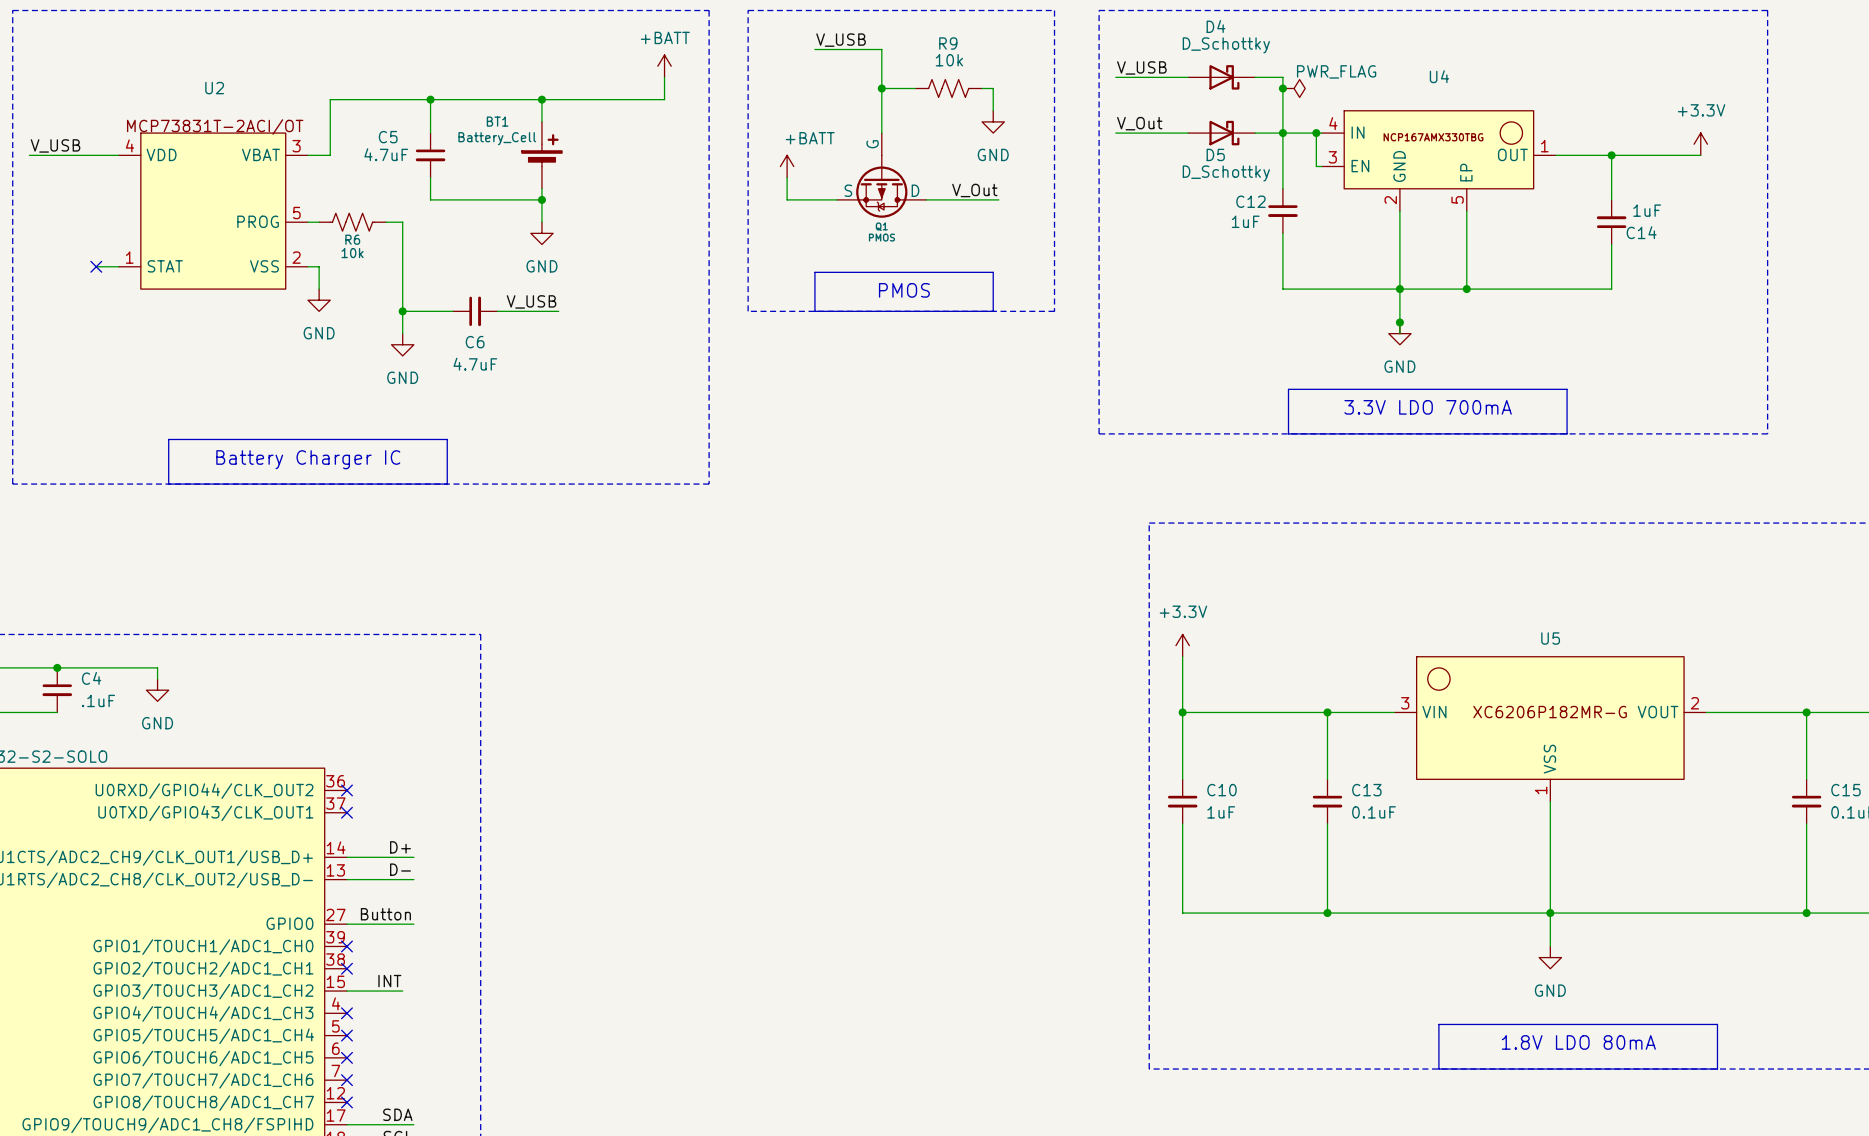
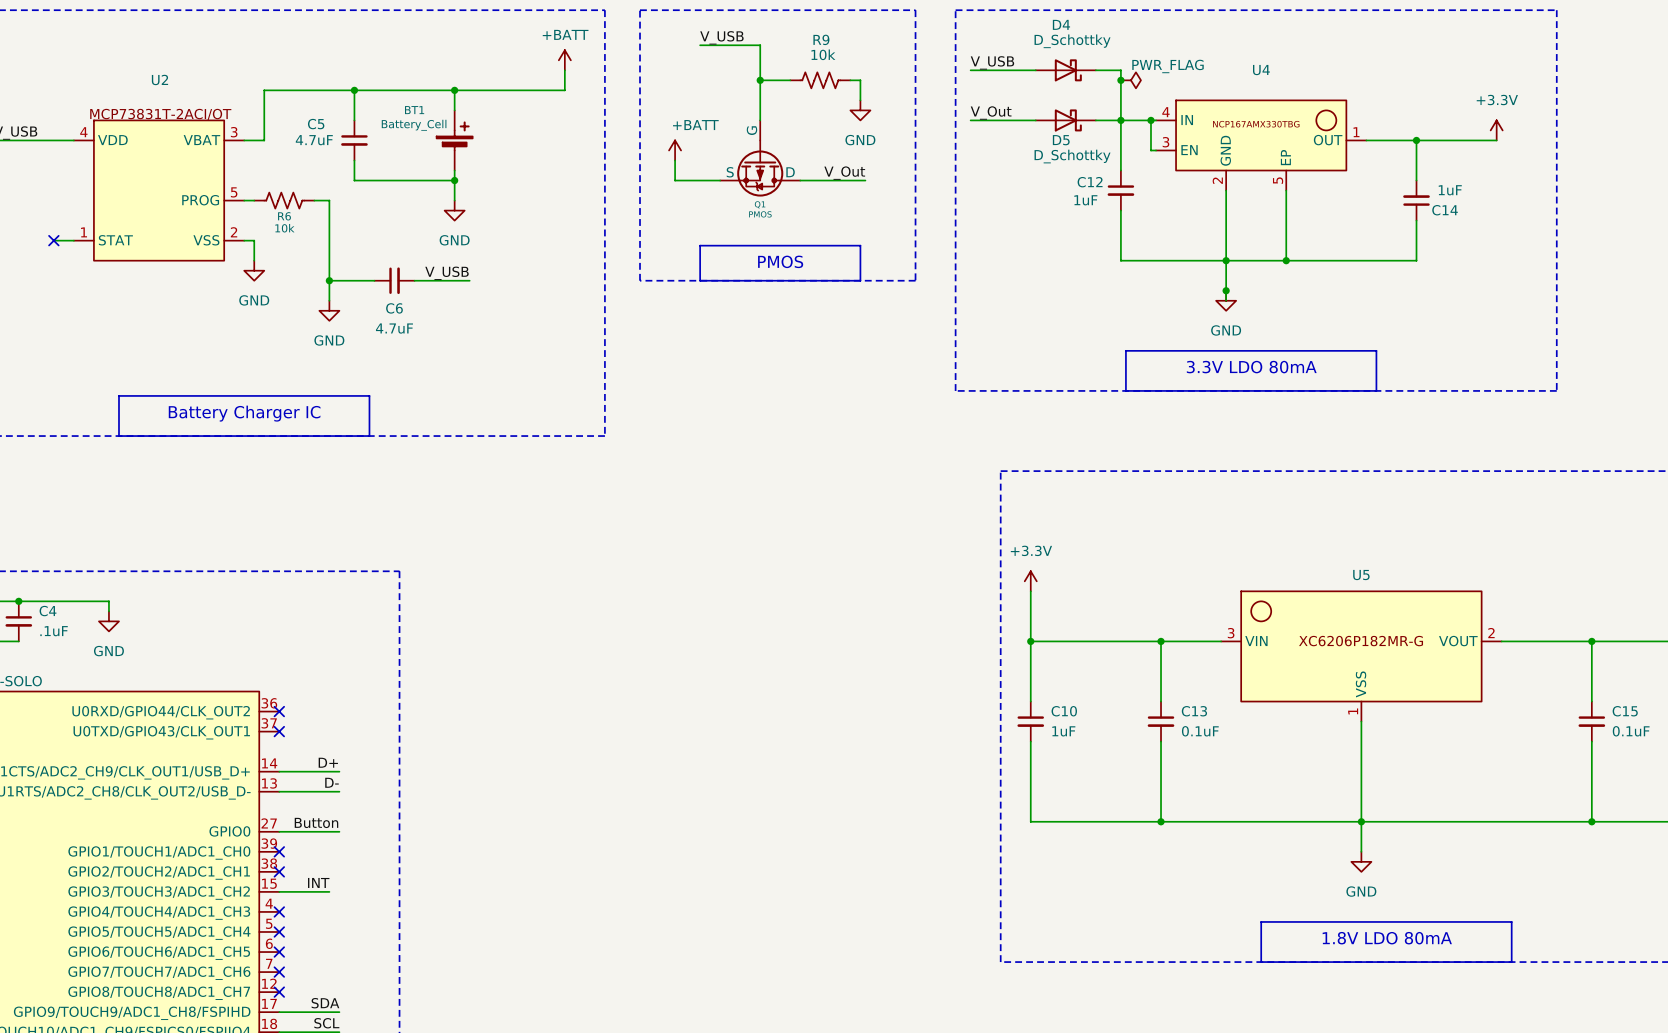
text: 3.3V LDO 700mA (1428, 407) -> 3.3V LDO 80mA (1251, 367)

